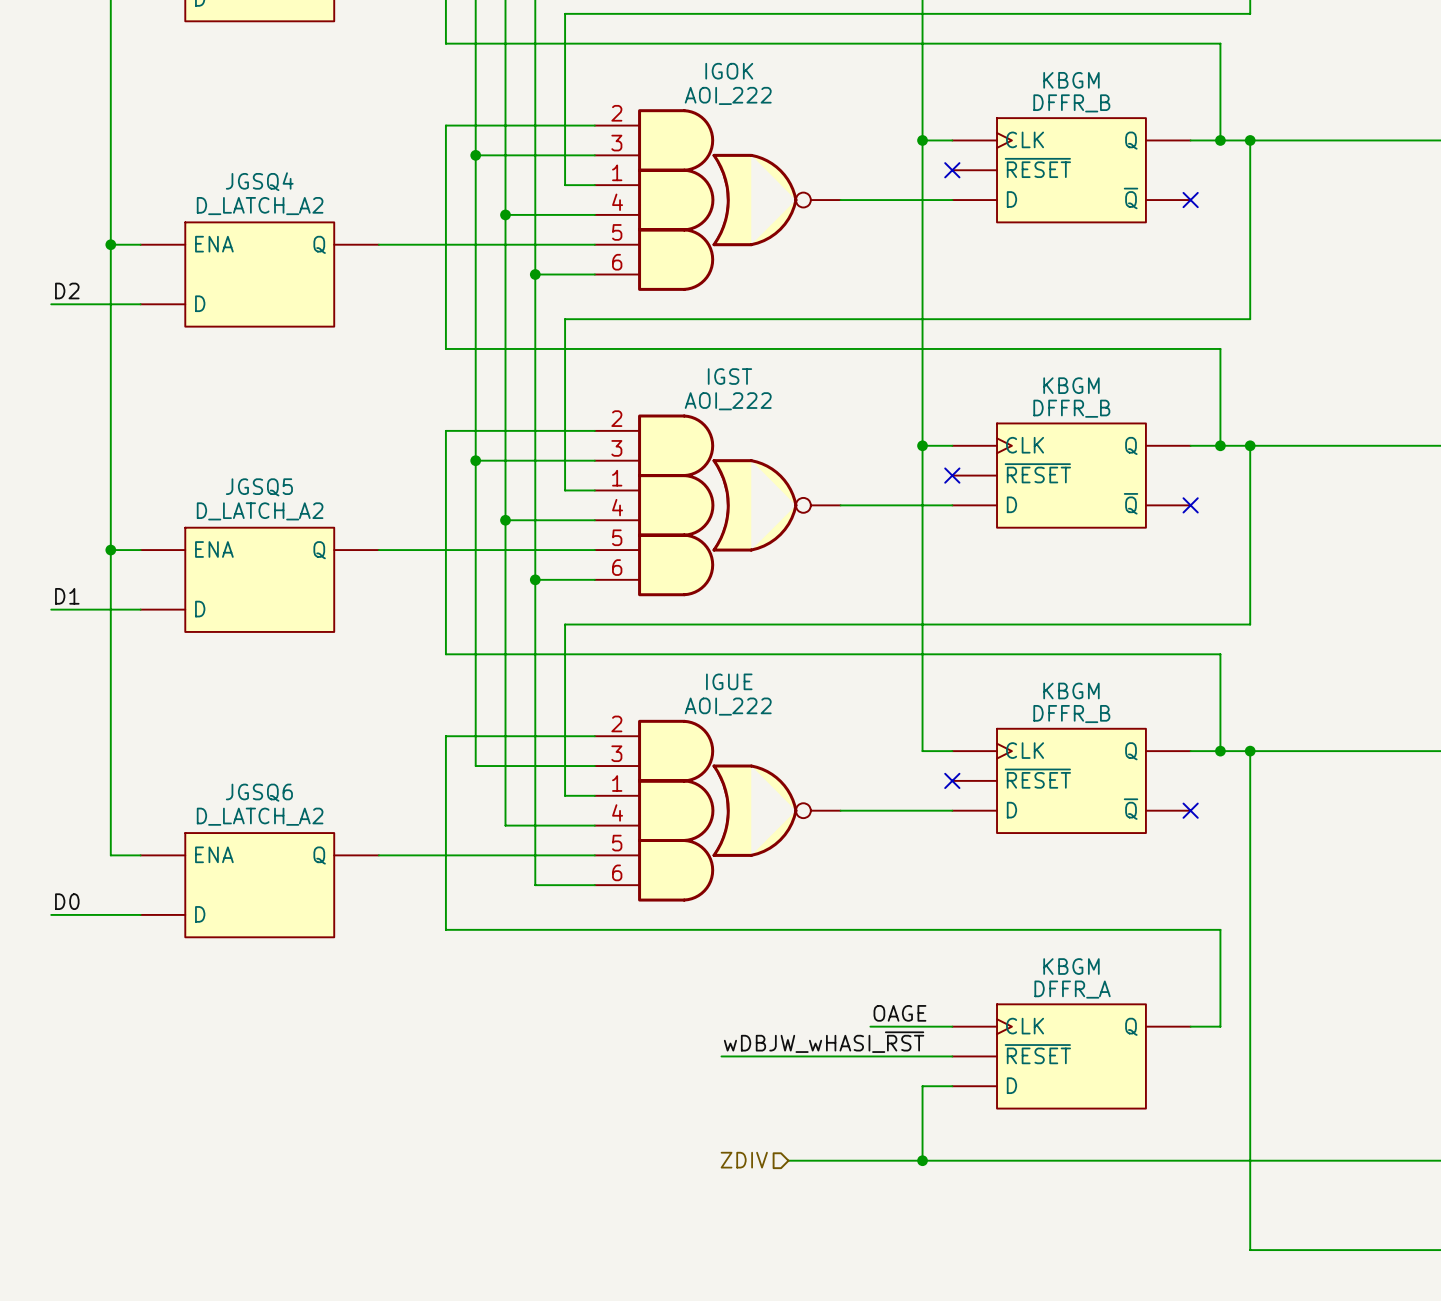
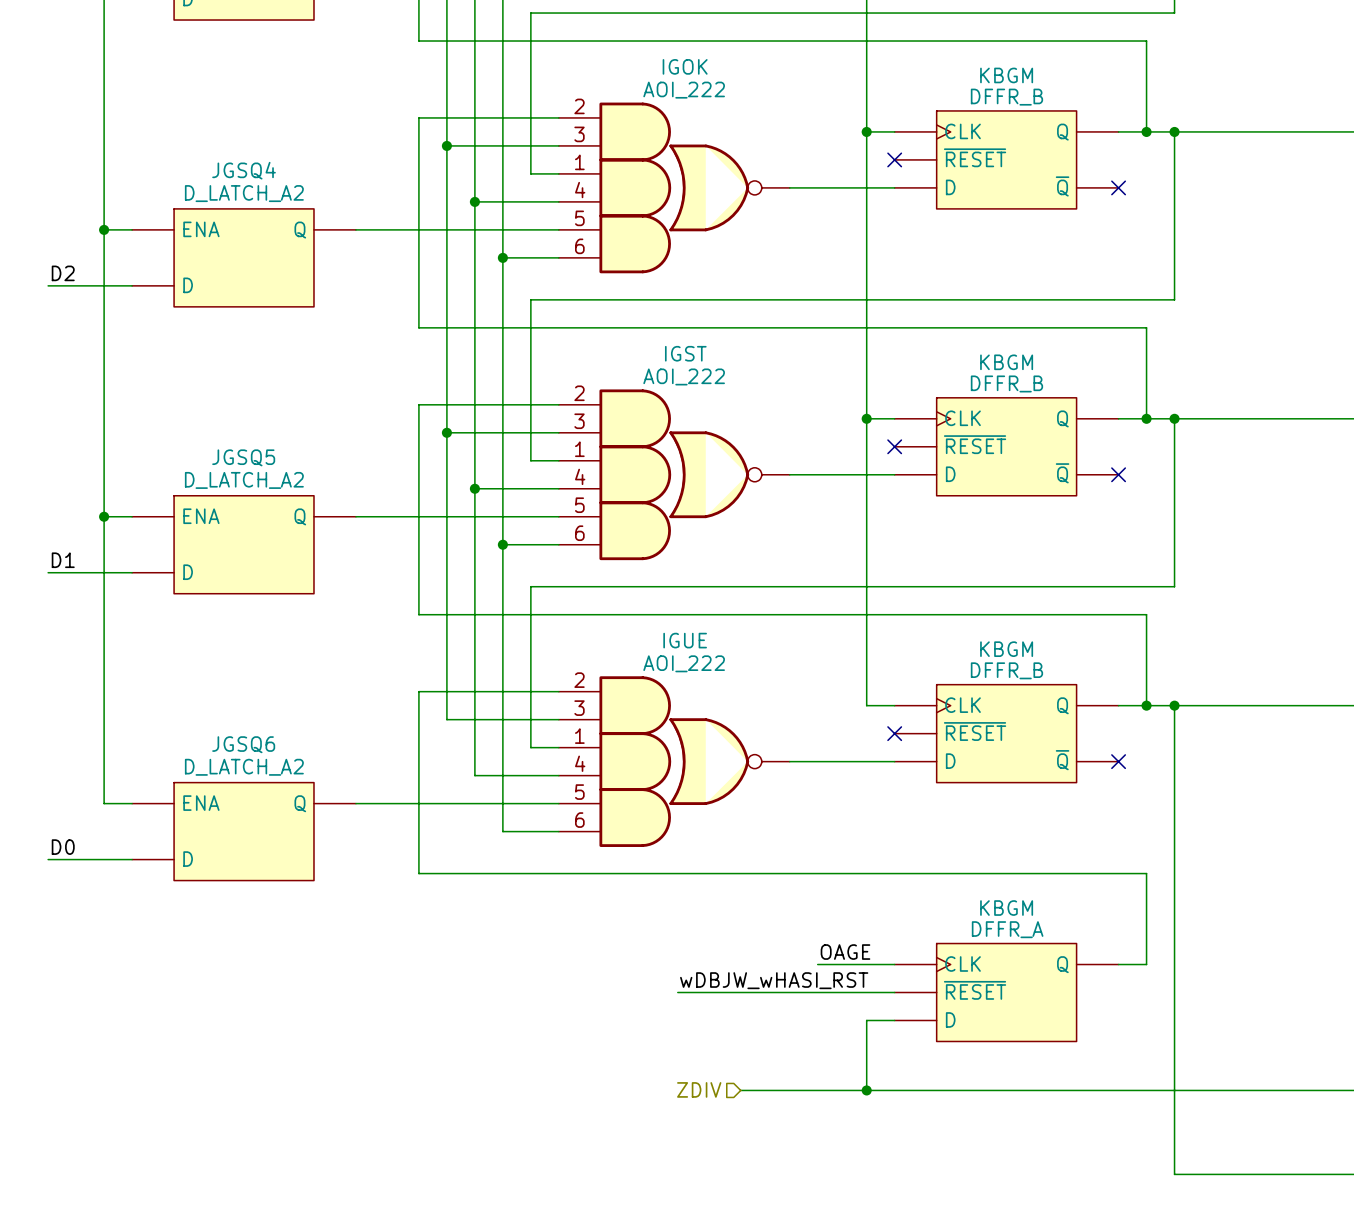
label: wDBJW_wHASI_~{RST} (824, 1042) -> wDBJW_wHASI_RST (774, 980)

